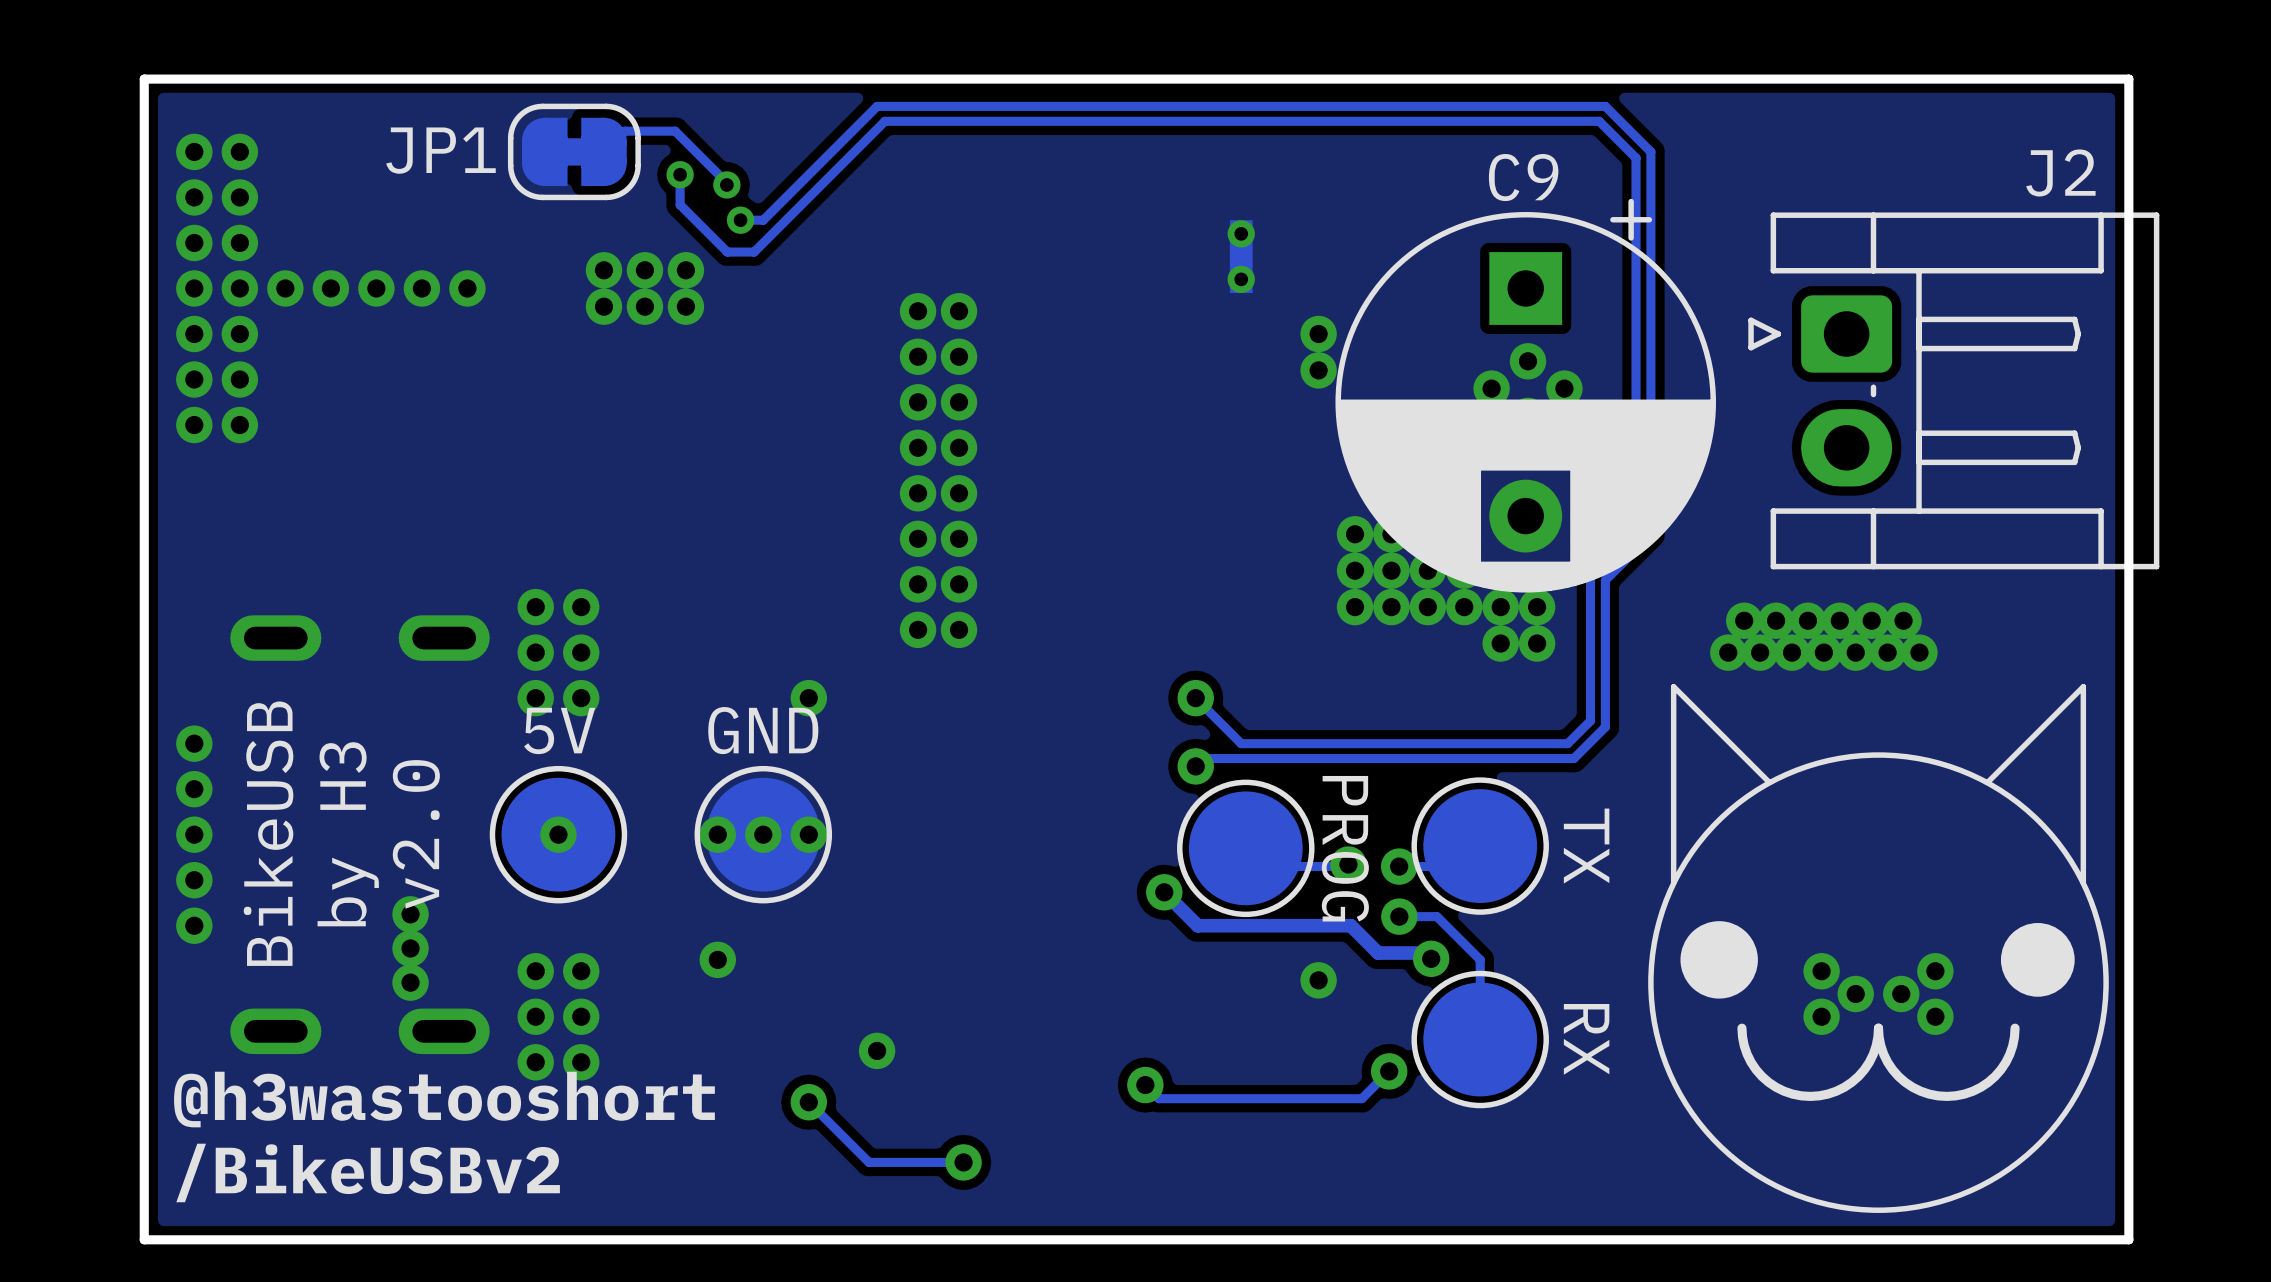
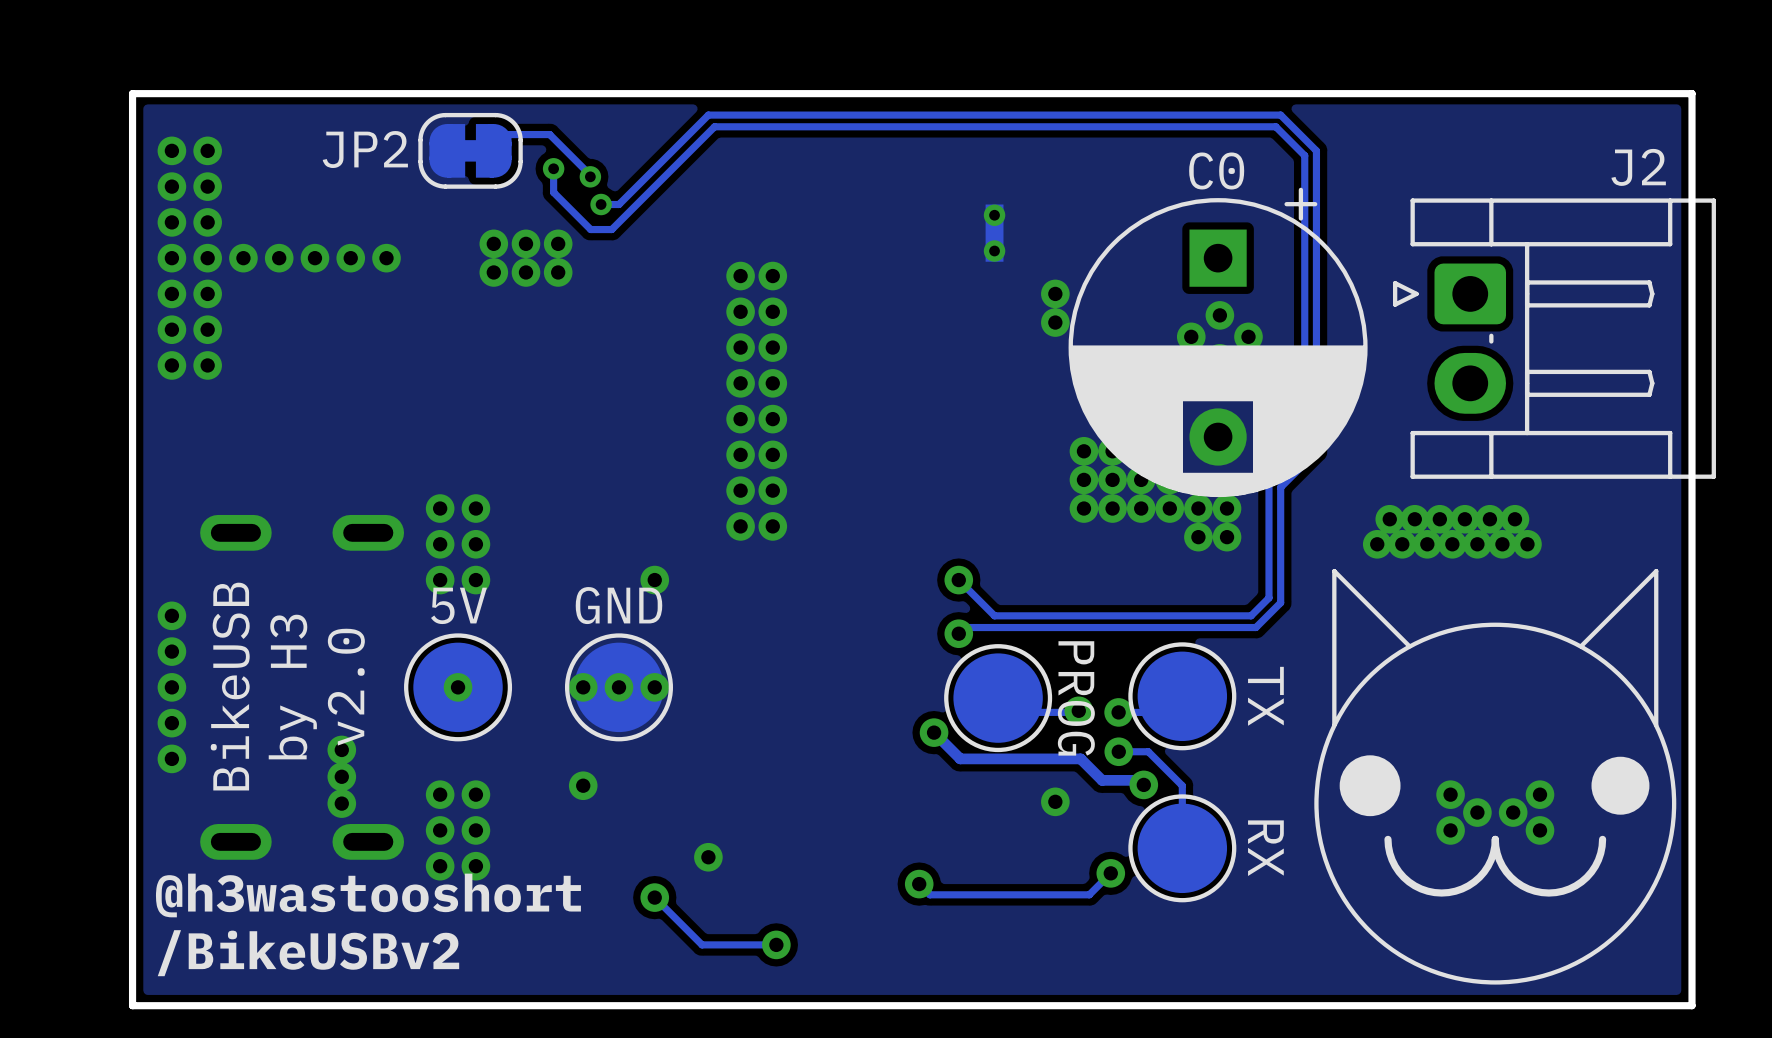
JP1 name: JP1 (441, 150) -> JP2 (365, 149)
C9 name: C9 (1523, 177) -> C0 (1216, 170)

